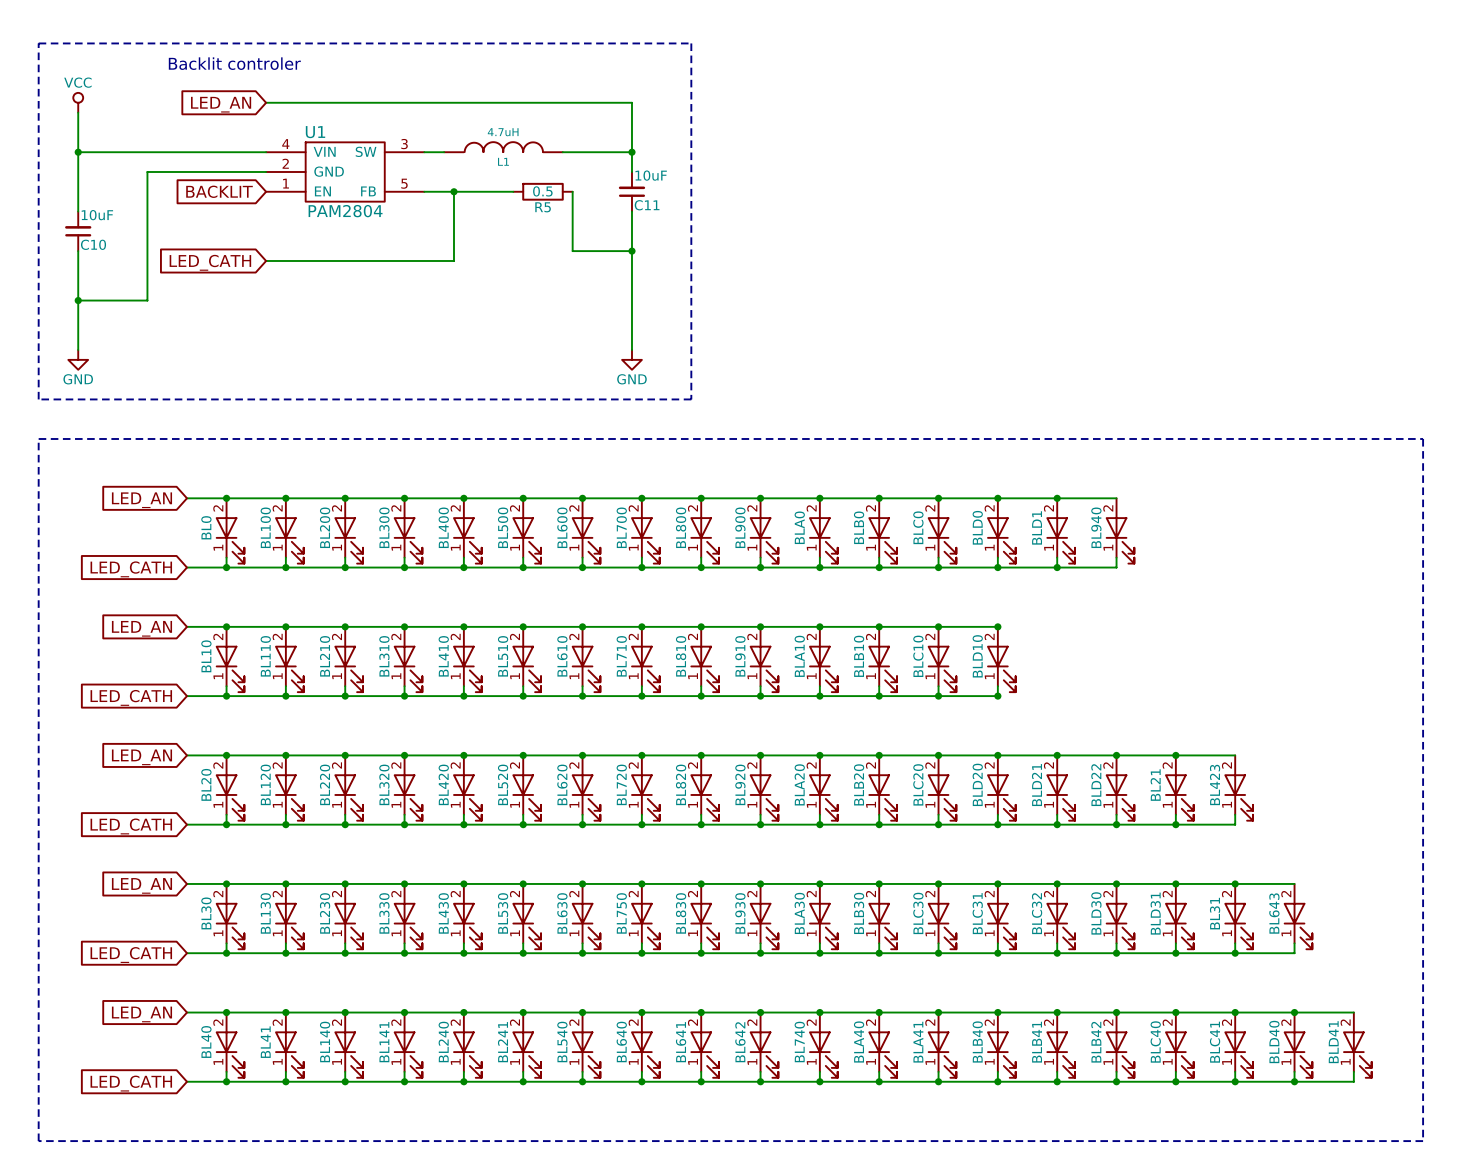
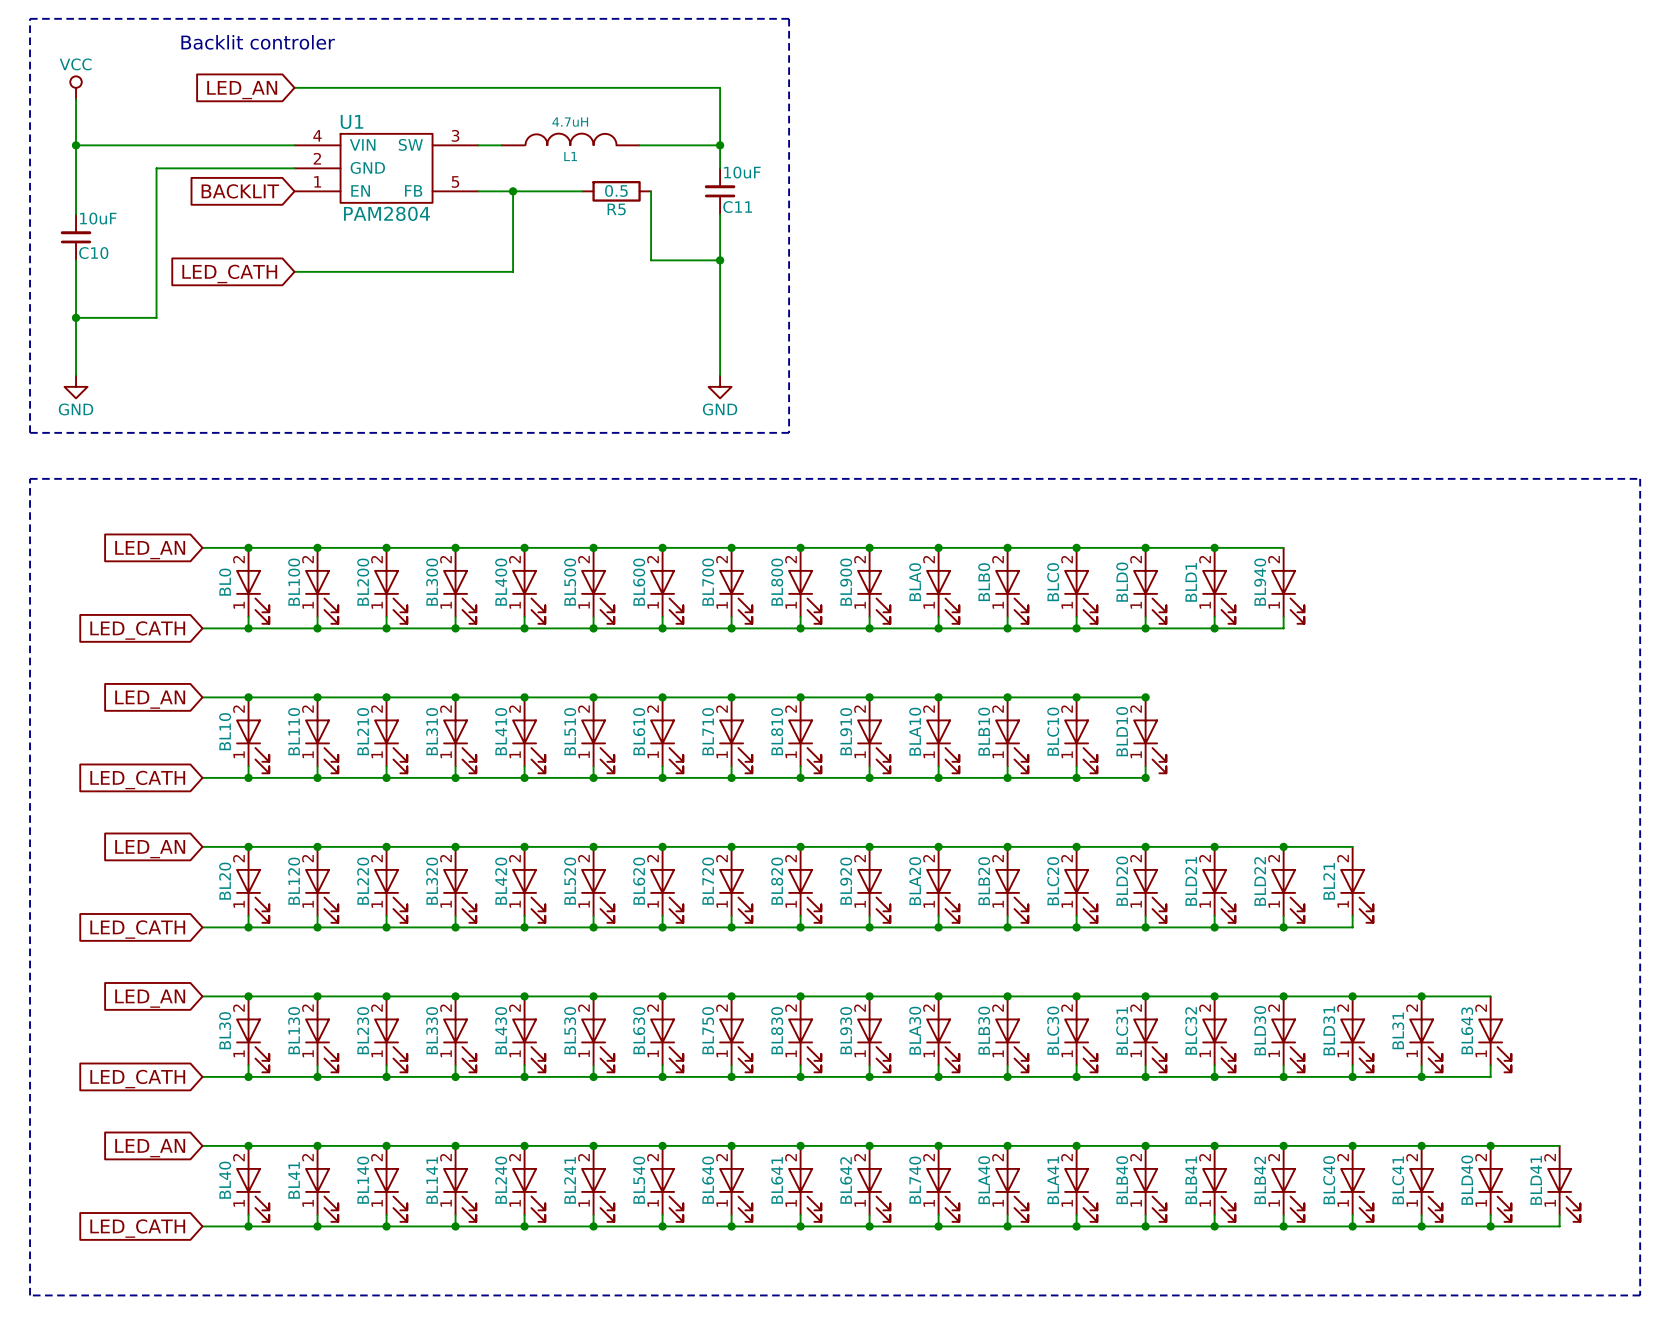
wire: (1175, 755) (1235, 755) -> none
junction: (1175, 755) -> none
BL423: (1238, 788) -> none
wire: (1235, 814) (1235, 824) (1175, 824) -> none
junction: (1175, 824) -> none

